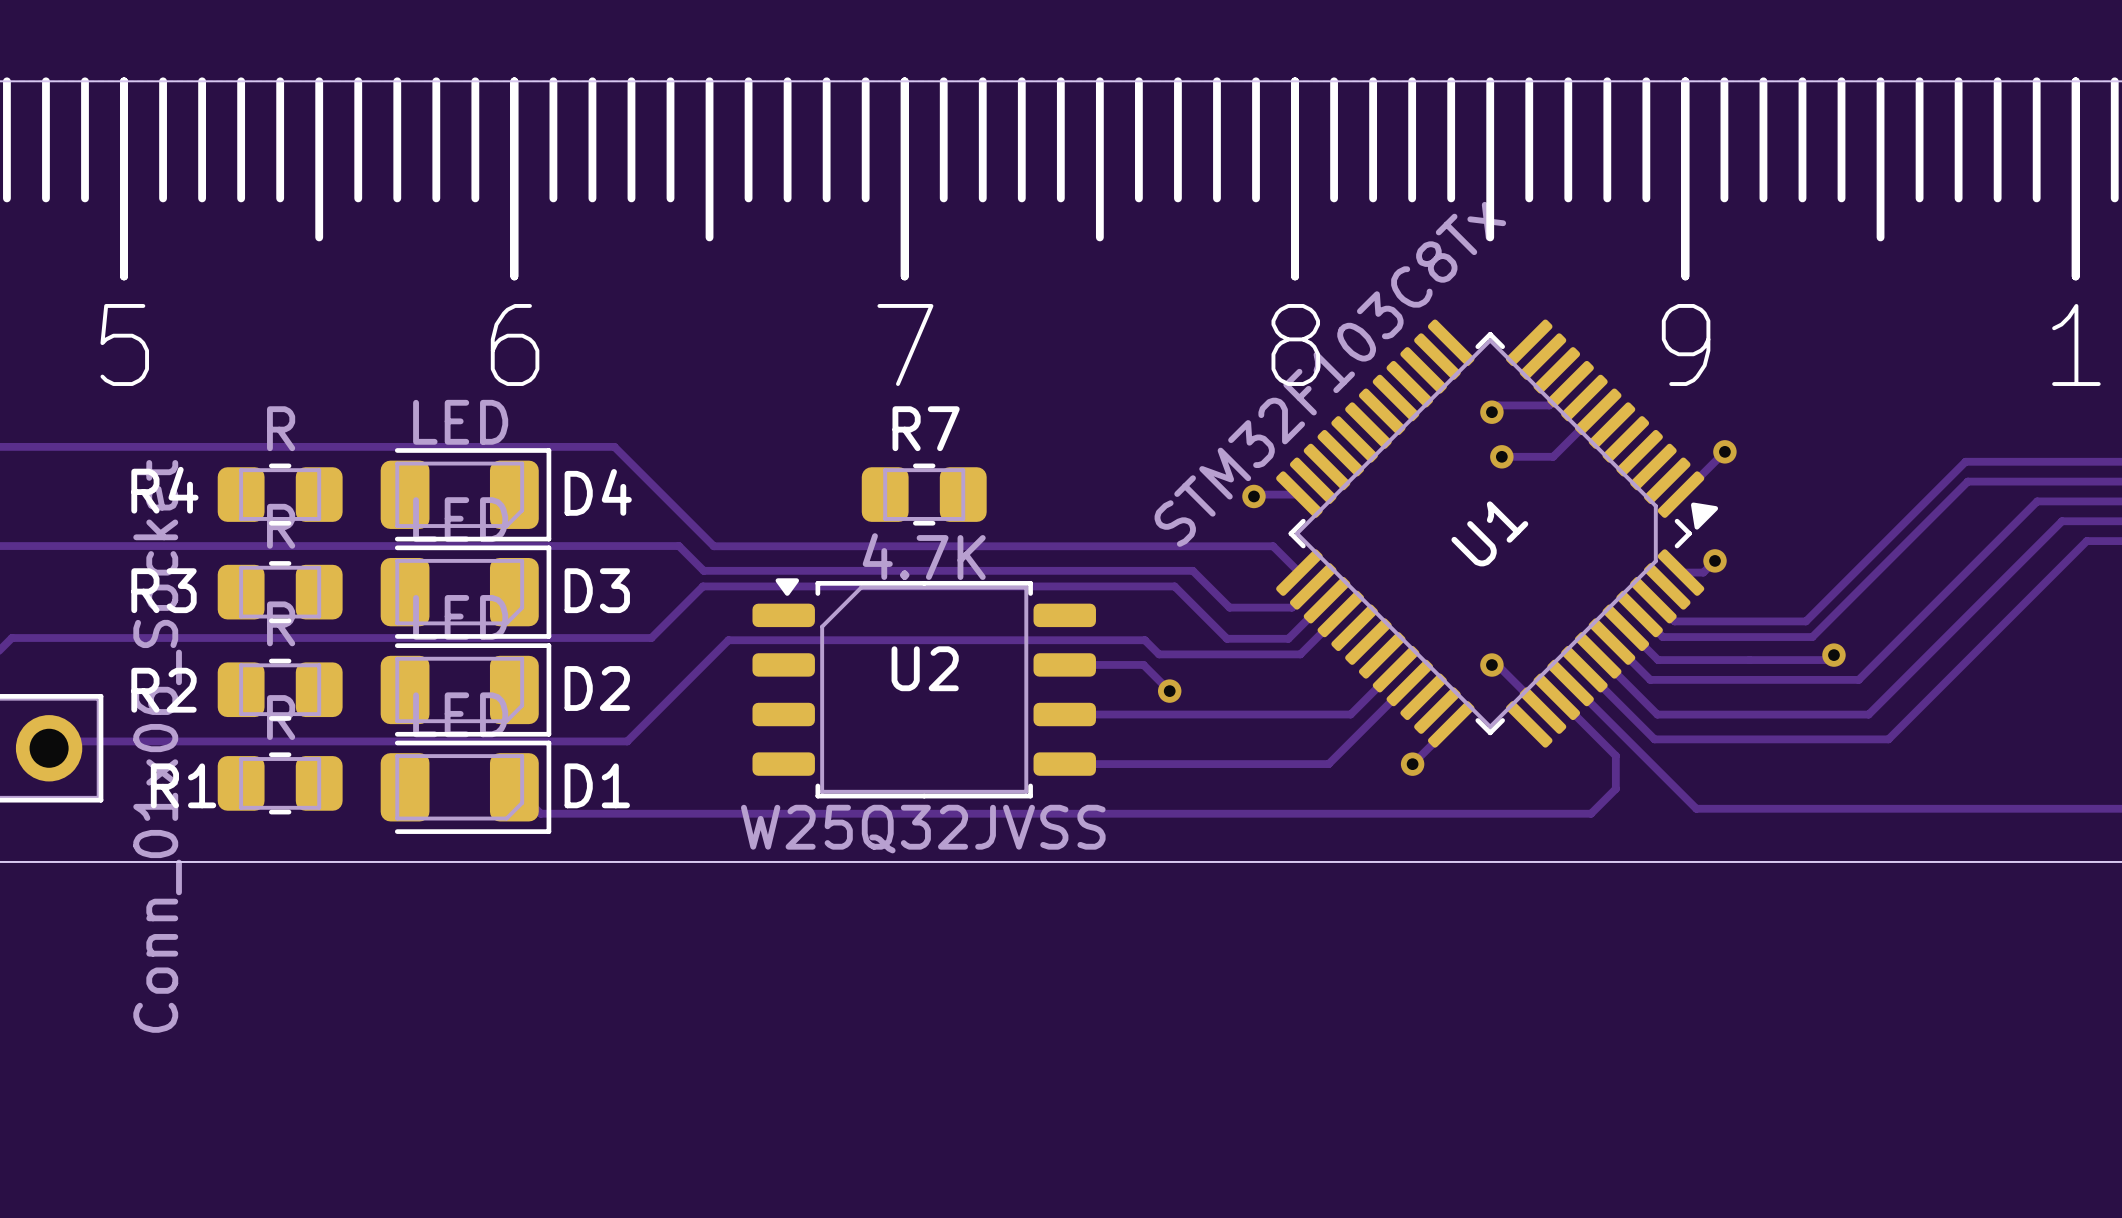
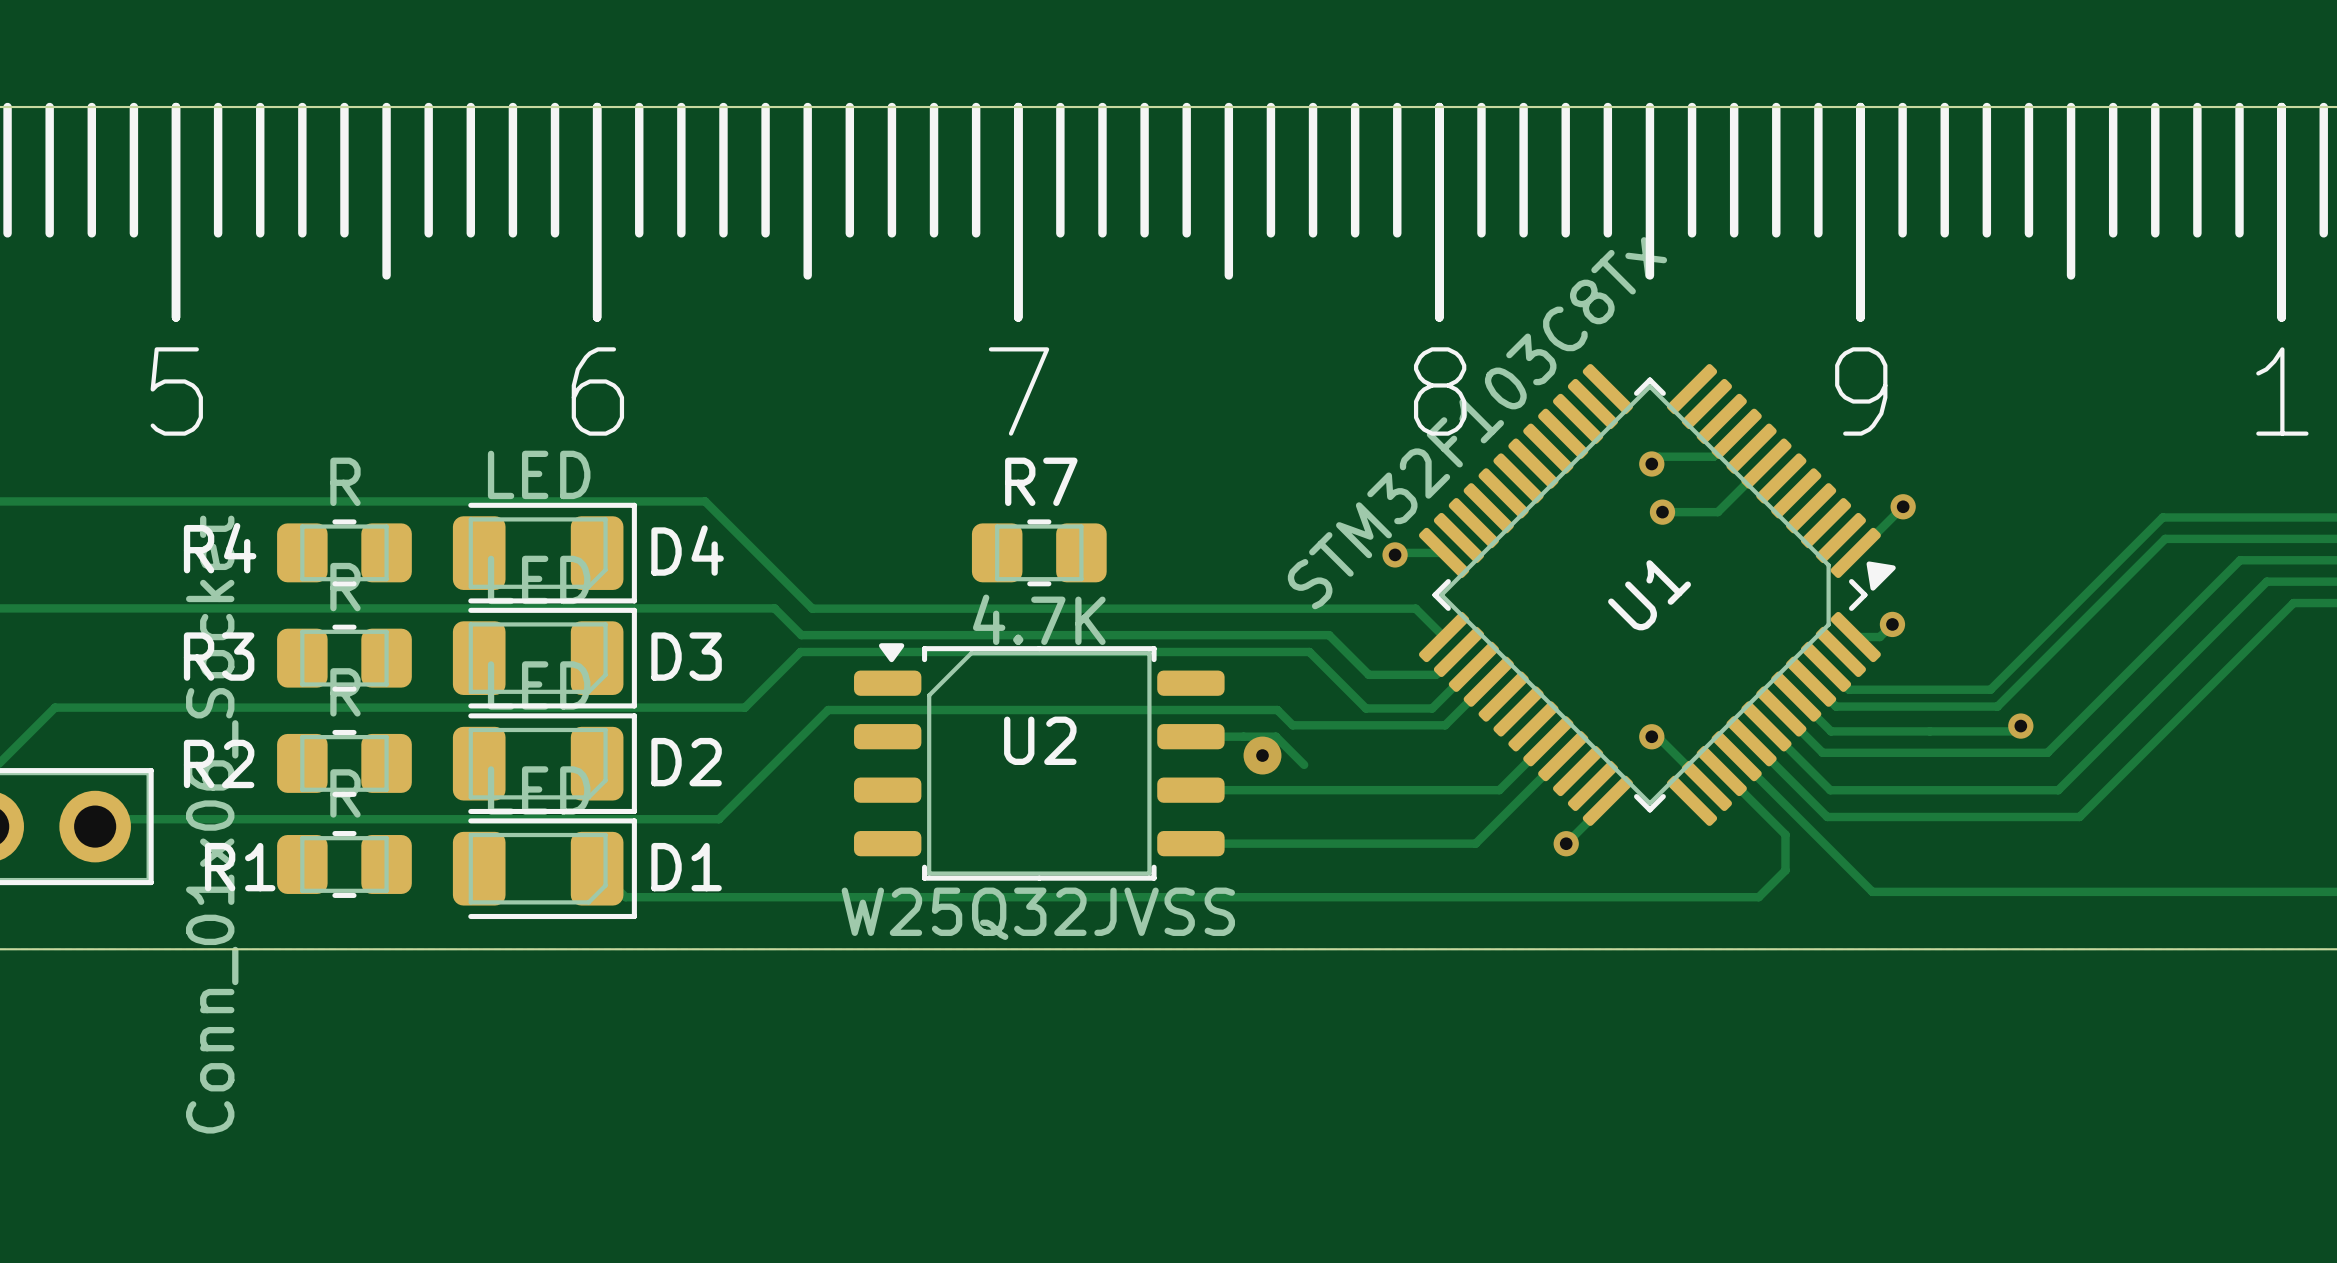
via: none -> (1262, 755)
via: (1169, 691) -> none

